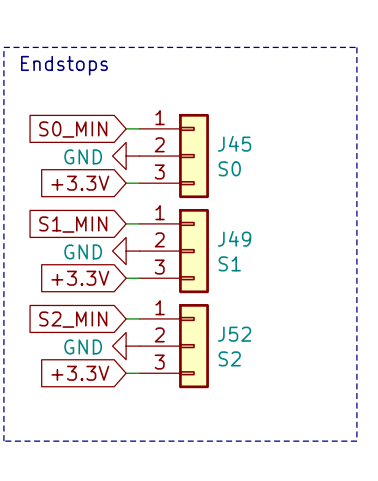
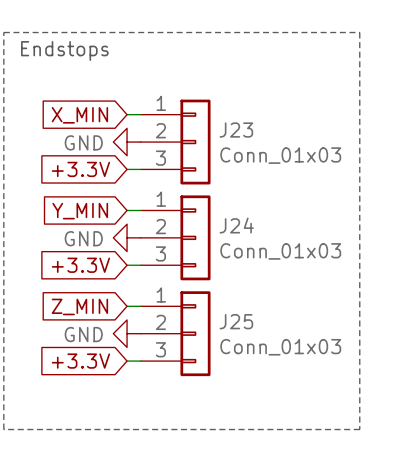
global label: S0_MIN (73, 129) -> X_MIN (79, 115)
J45 name: J45 (234, 143) -> J23 (236, 130)
J45 value: S0 (229, 168) -> Conn_01x03 (280, 155)
global label: S1_MIN (73, 224) -> Y_MIN (80, 211)
J49 name: J49 (234, 238) -> J24 (236, 225)
J49 value: S1 (229, 263) -> Conn_01x03 (280, 251)
global label: S2_MIN (73, 319) -> Z_MIN (79, 306)
J52 name: J52 (234, 334) -> J25 (236, 321)
J52 value: S2 (229, 358) -> Conn_01x03 (280, 347)

